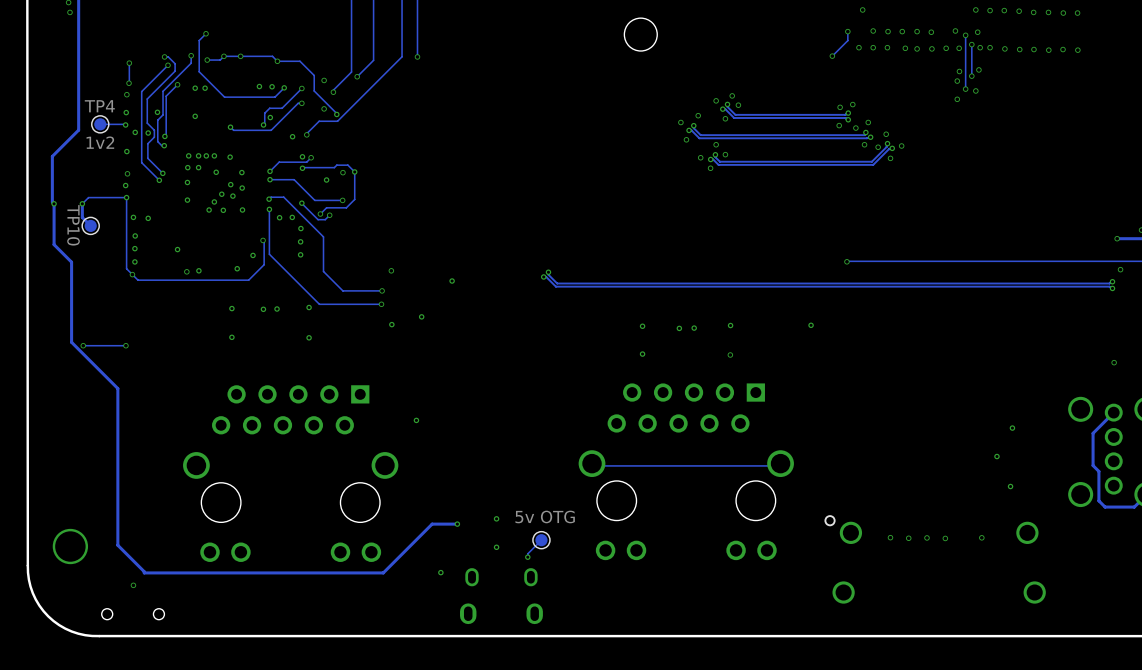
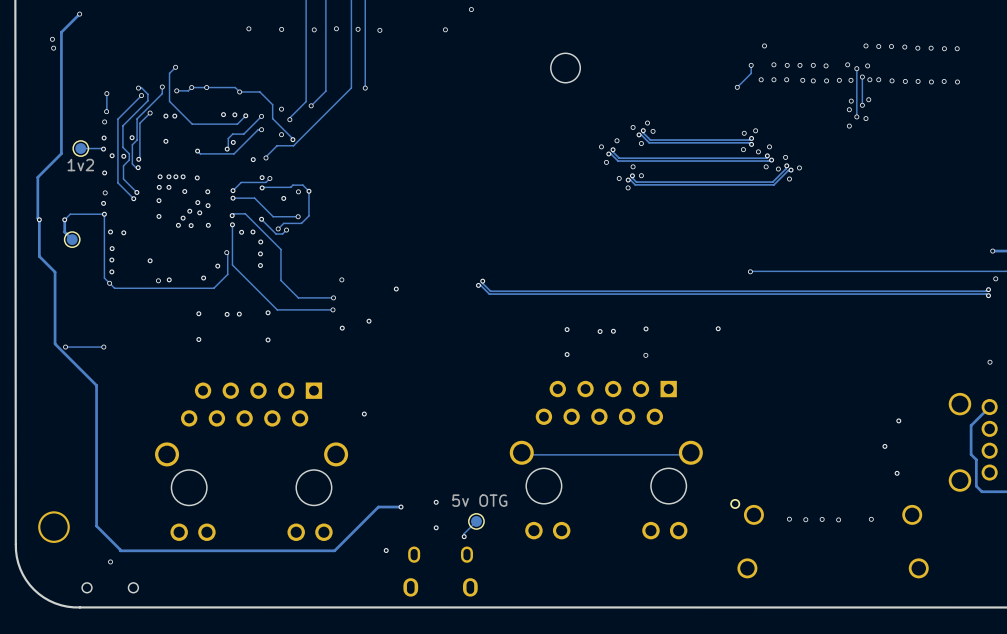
TP4 name: TP4 (99, 106) -> none
TP10 name: TP10 (73, 225) -> none

